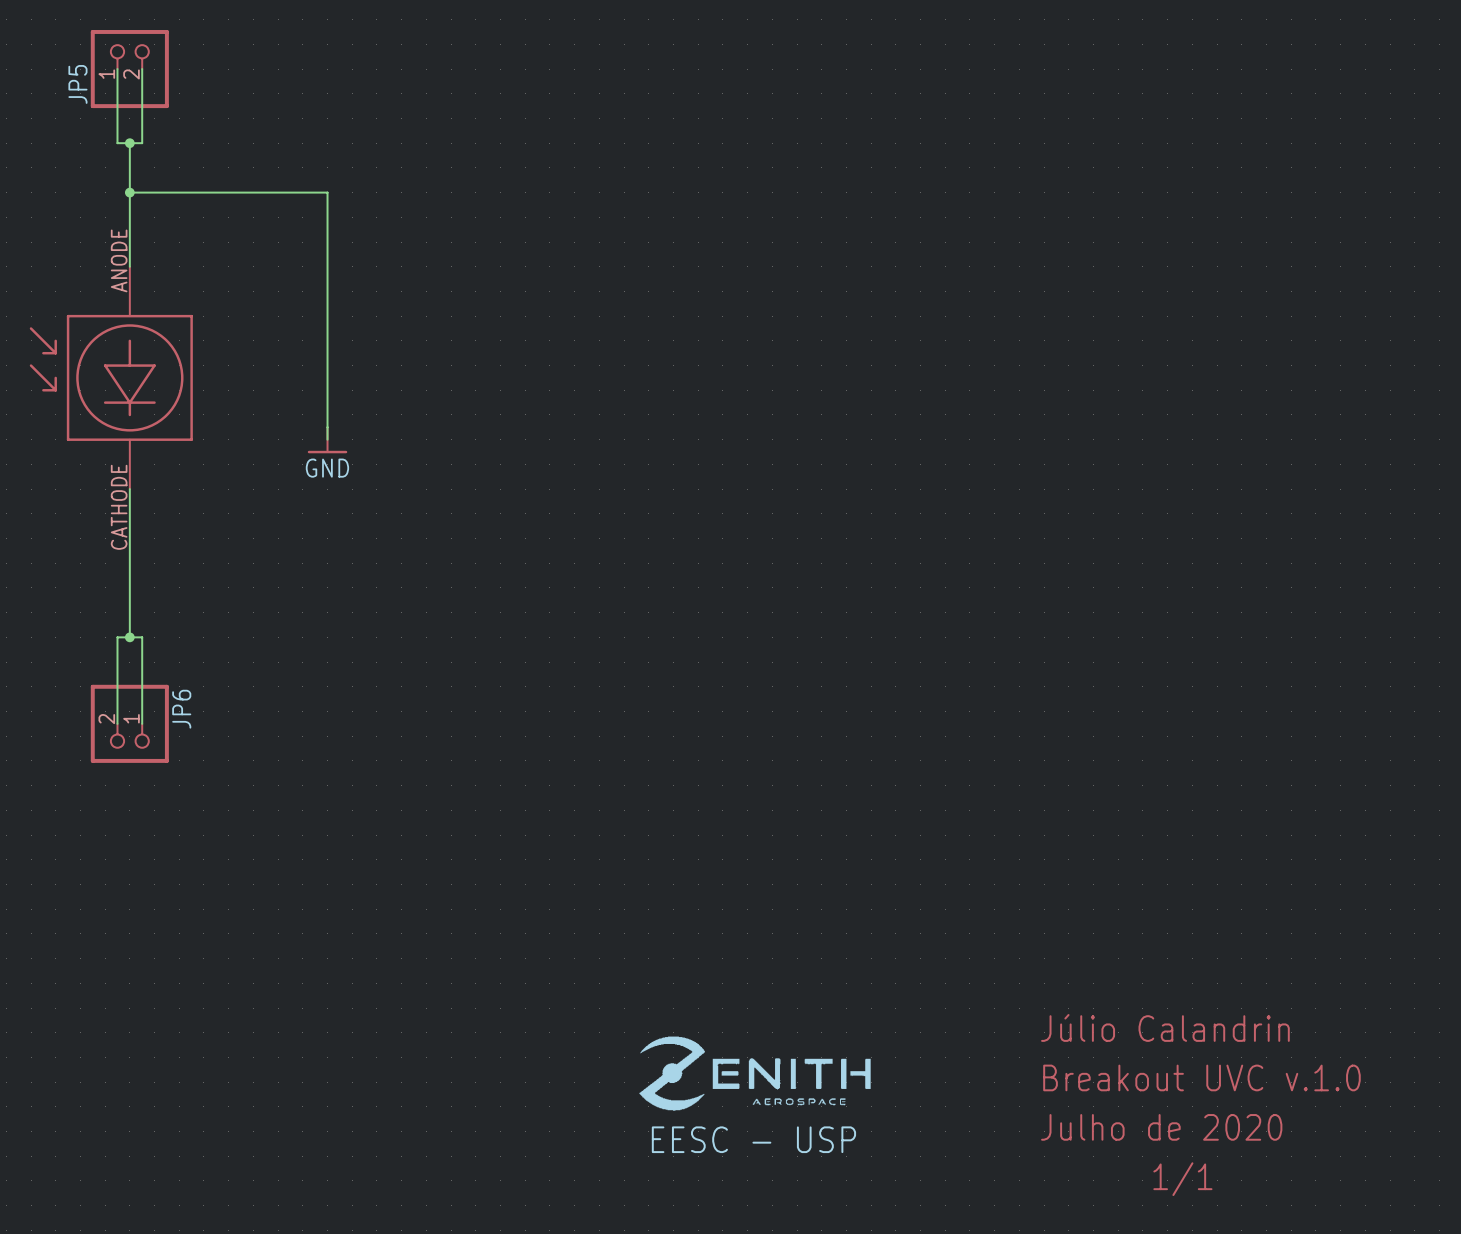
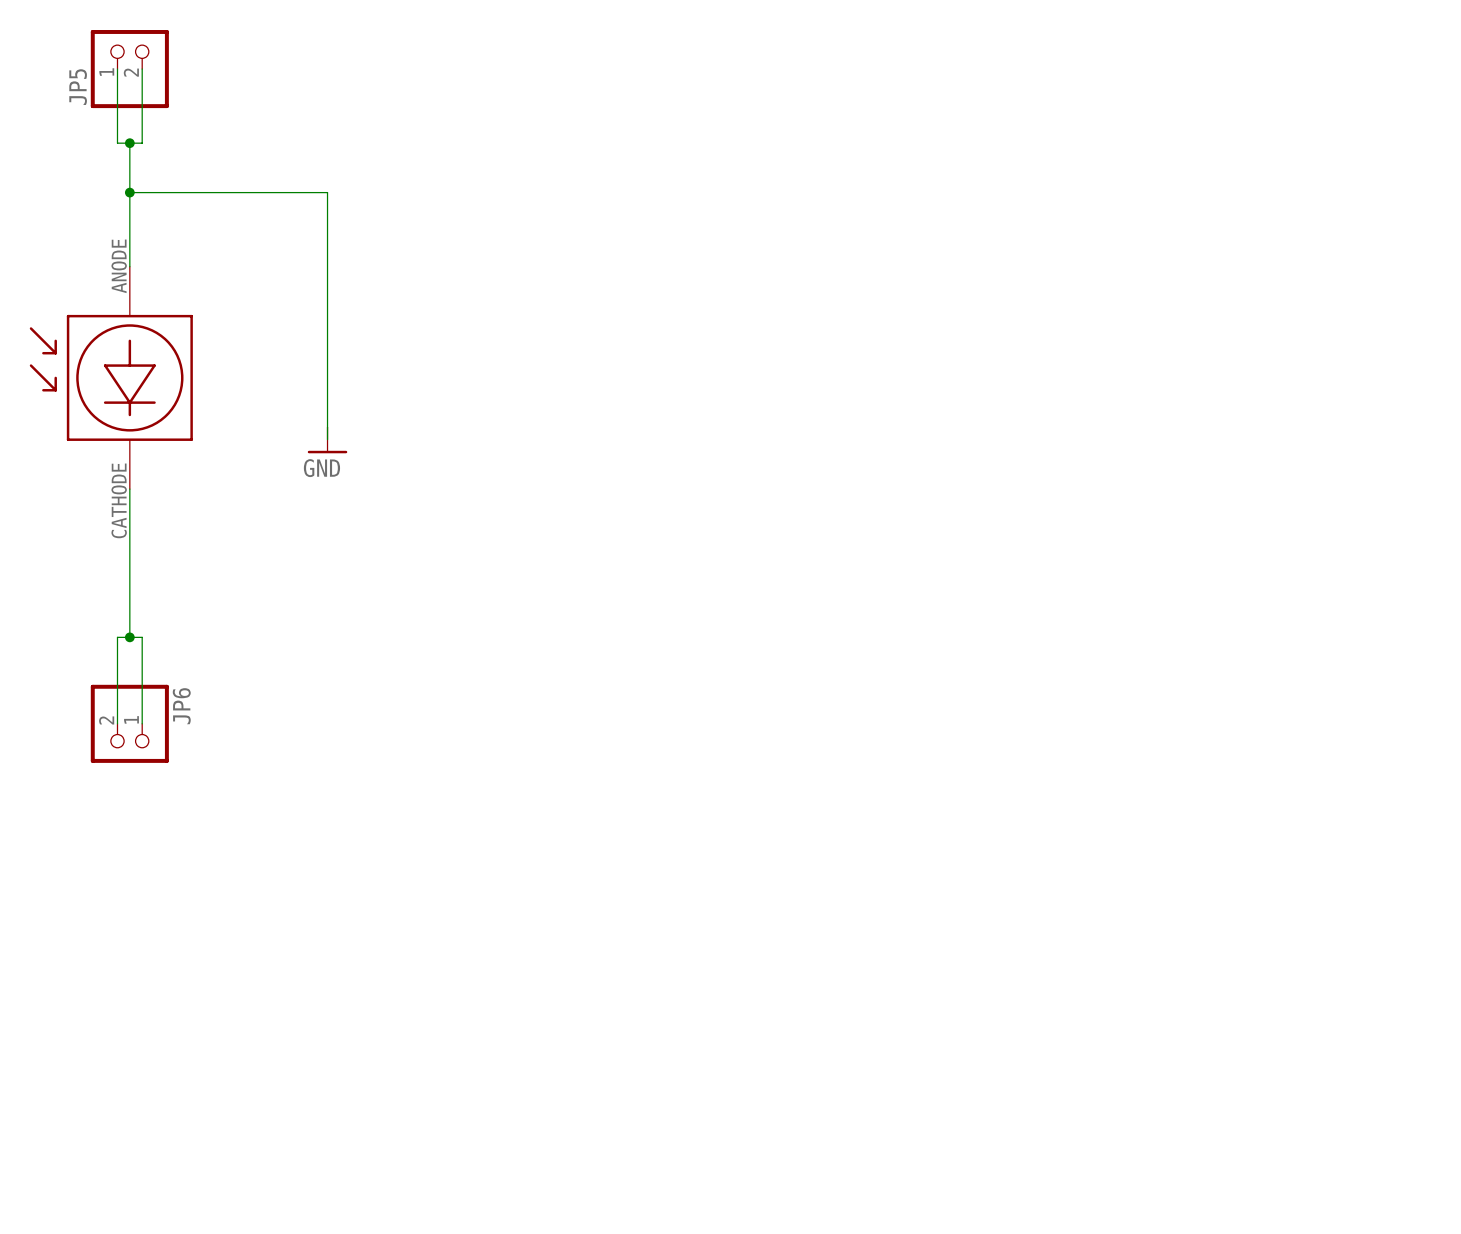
text: Júlio Calandrin (1165, 1027) -> none
drawing: [639, 1036, 871, 1111] -> none
text: Breakout UVC v.1.0 (1201, 1077) -> none
text: Julho de 2020 (1161, 1127) -> none
text: EESC - USP (753, 1139) -> none
text: 1/1 (1182, 1179) -> none

